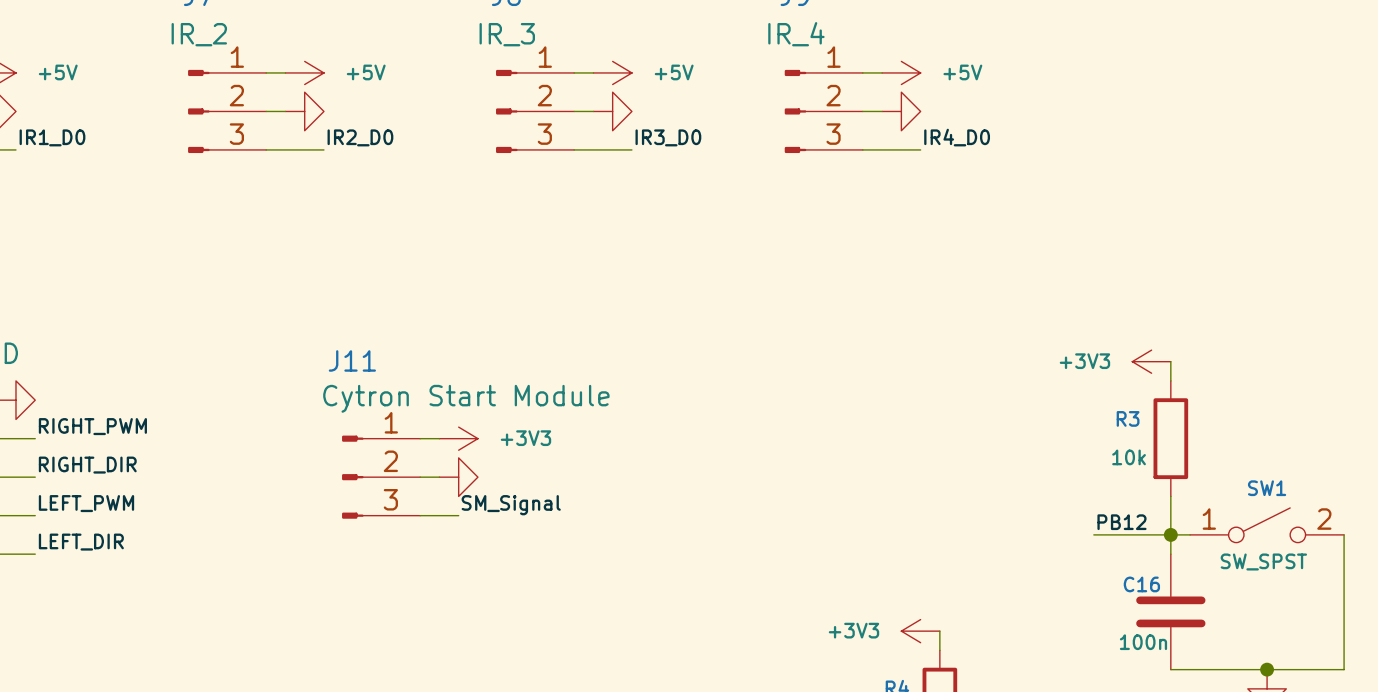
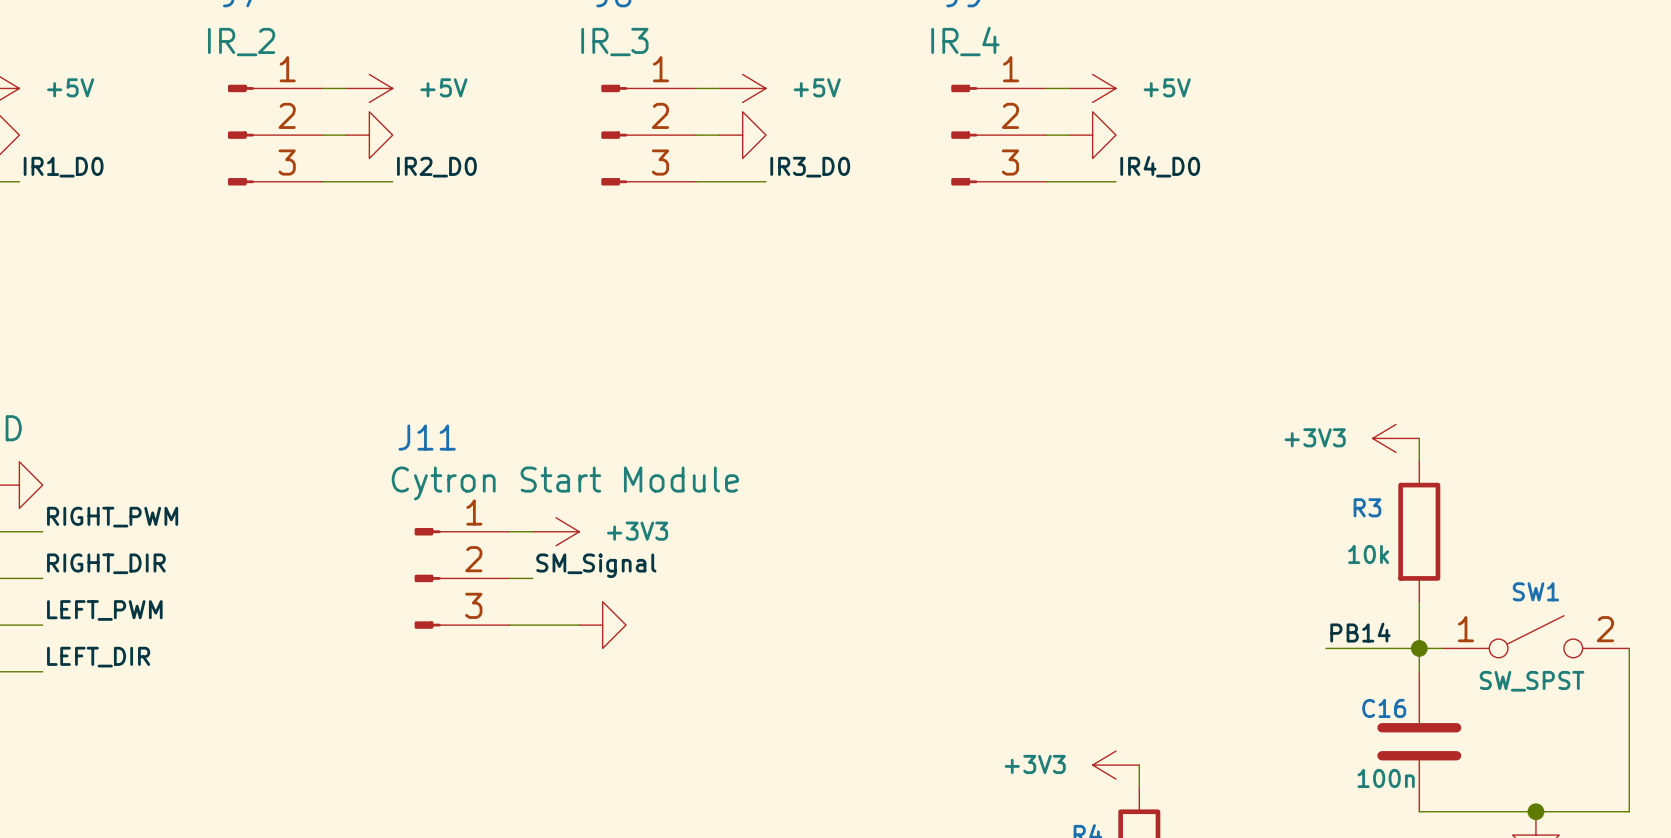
power symbol position: (458, 477) -> (602, 625)
label position: SM_Signal (511, 505) -> SM_Signal (596, 565)
wire: none -> (556, 625) (579, 625)
label: PB12 (1121, 522) -> PB14 (1360, 632)

